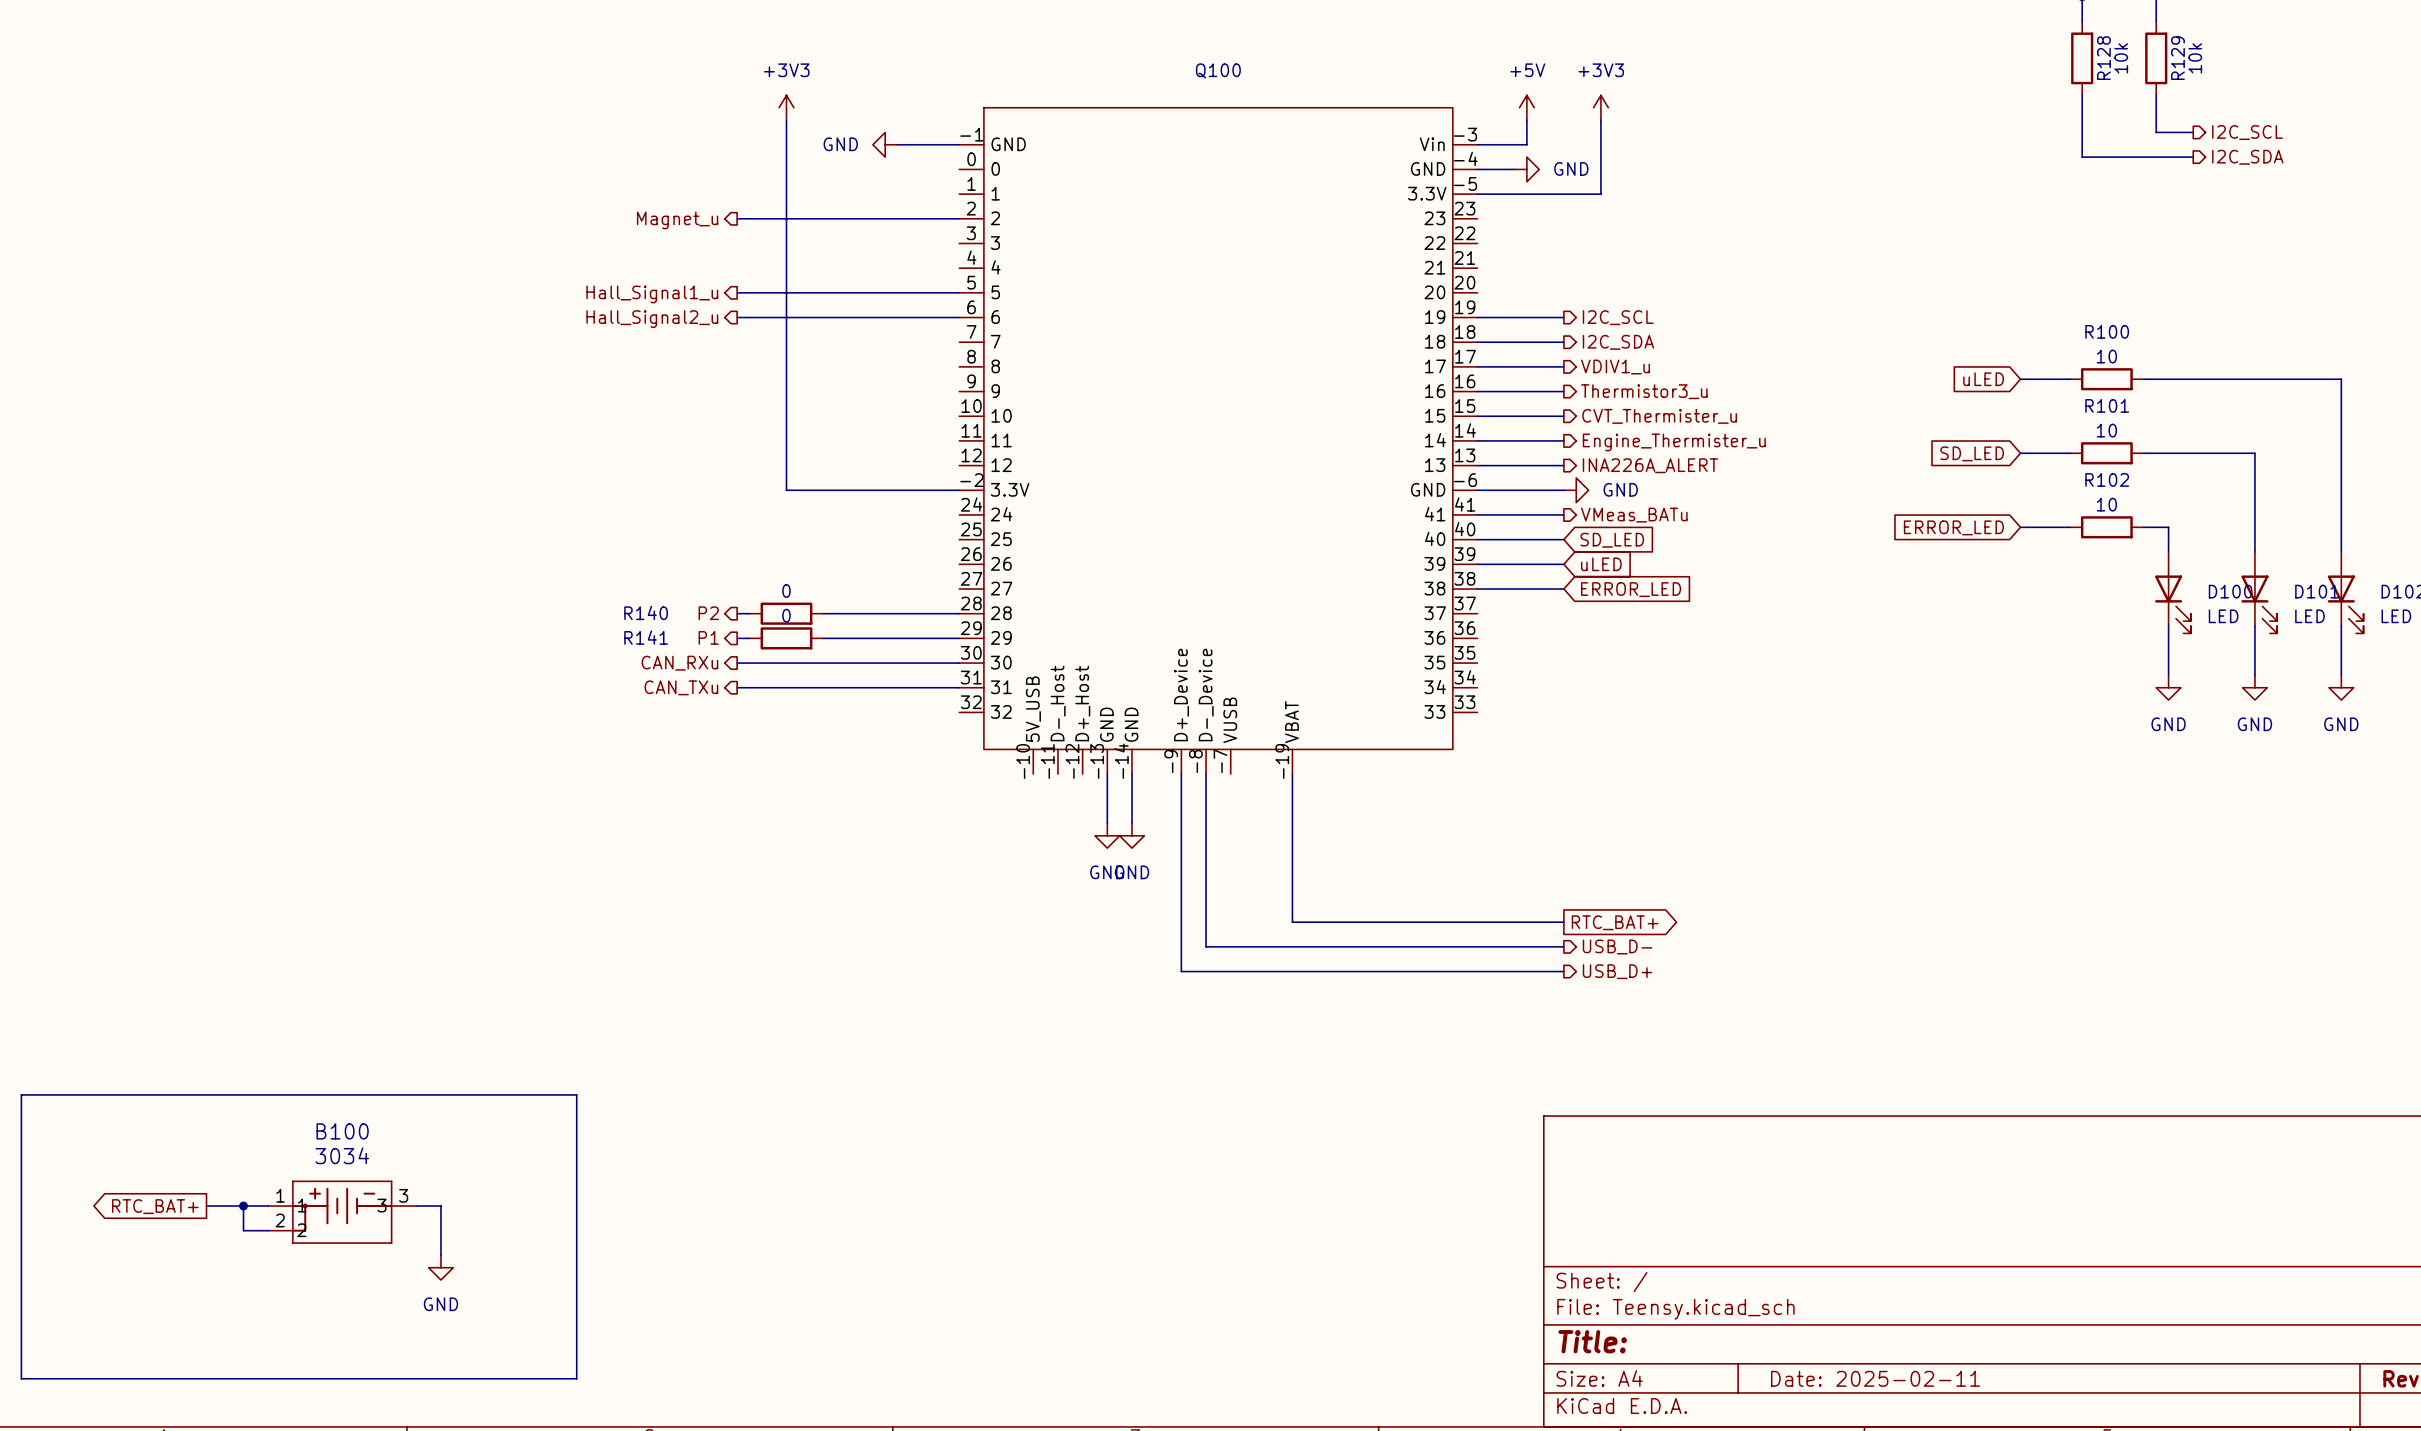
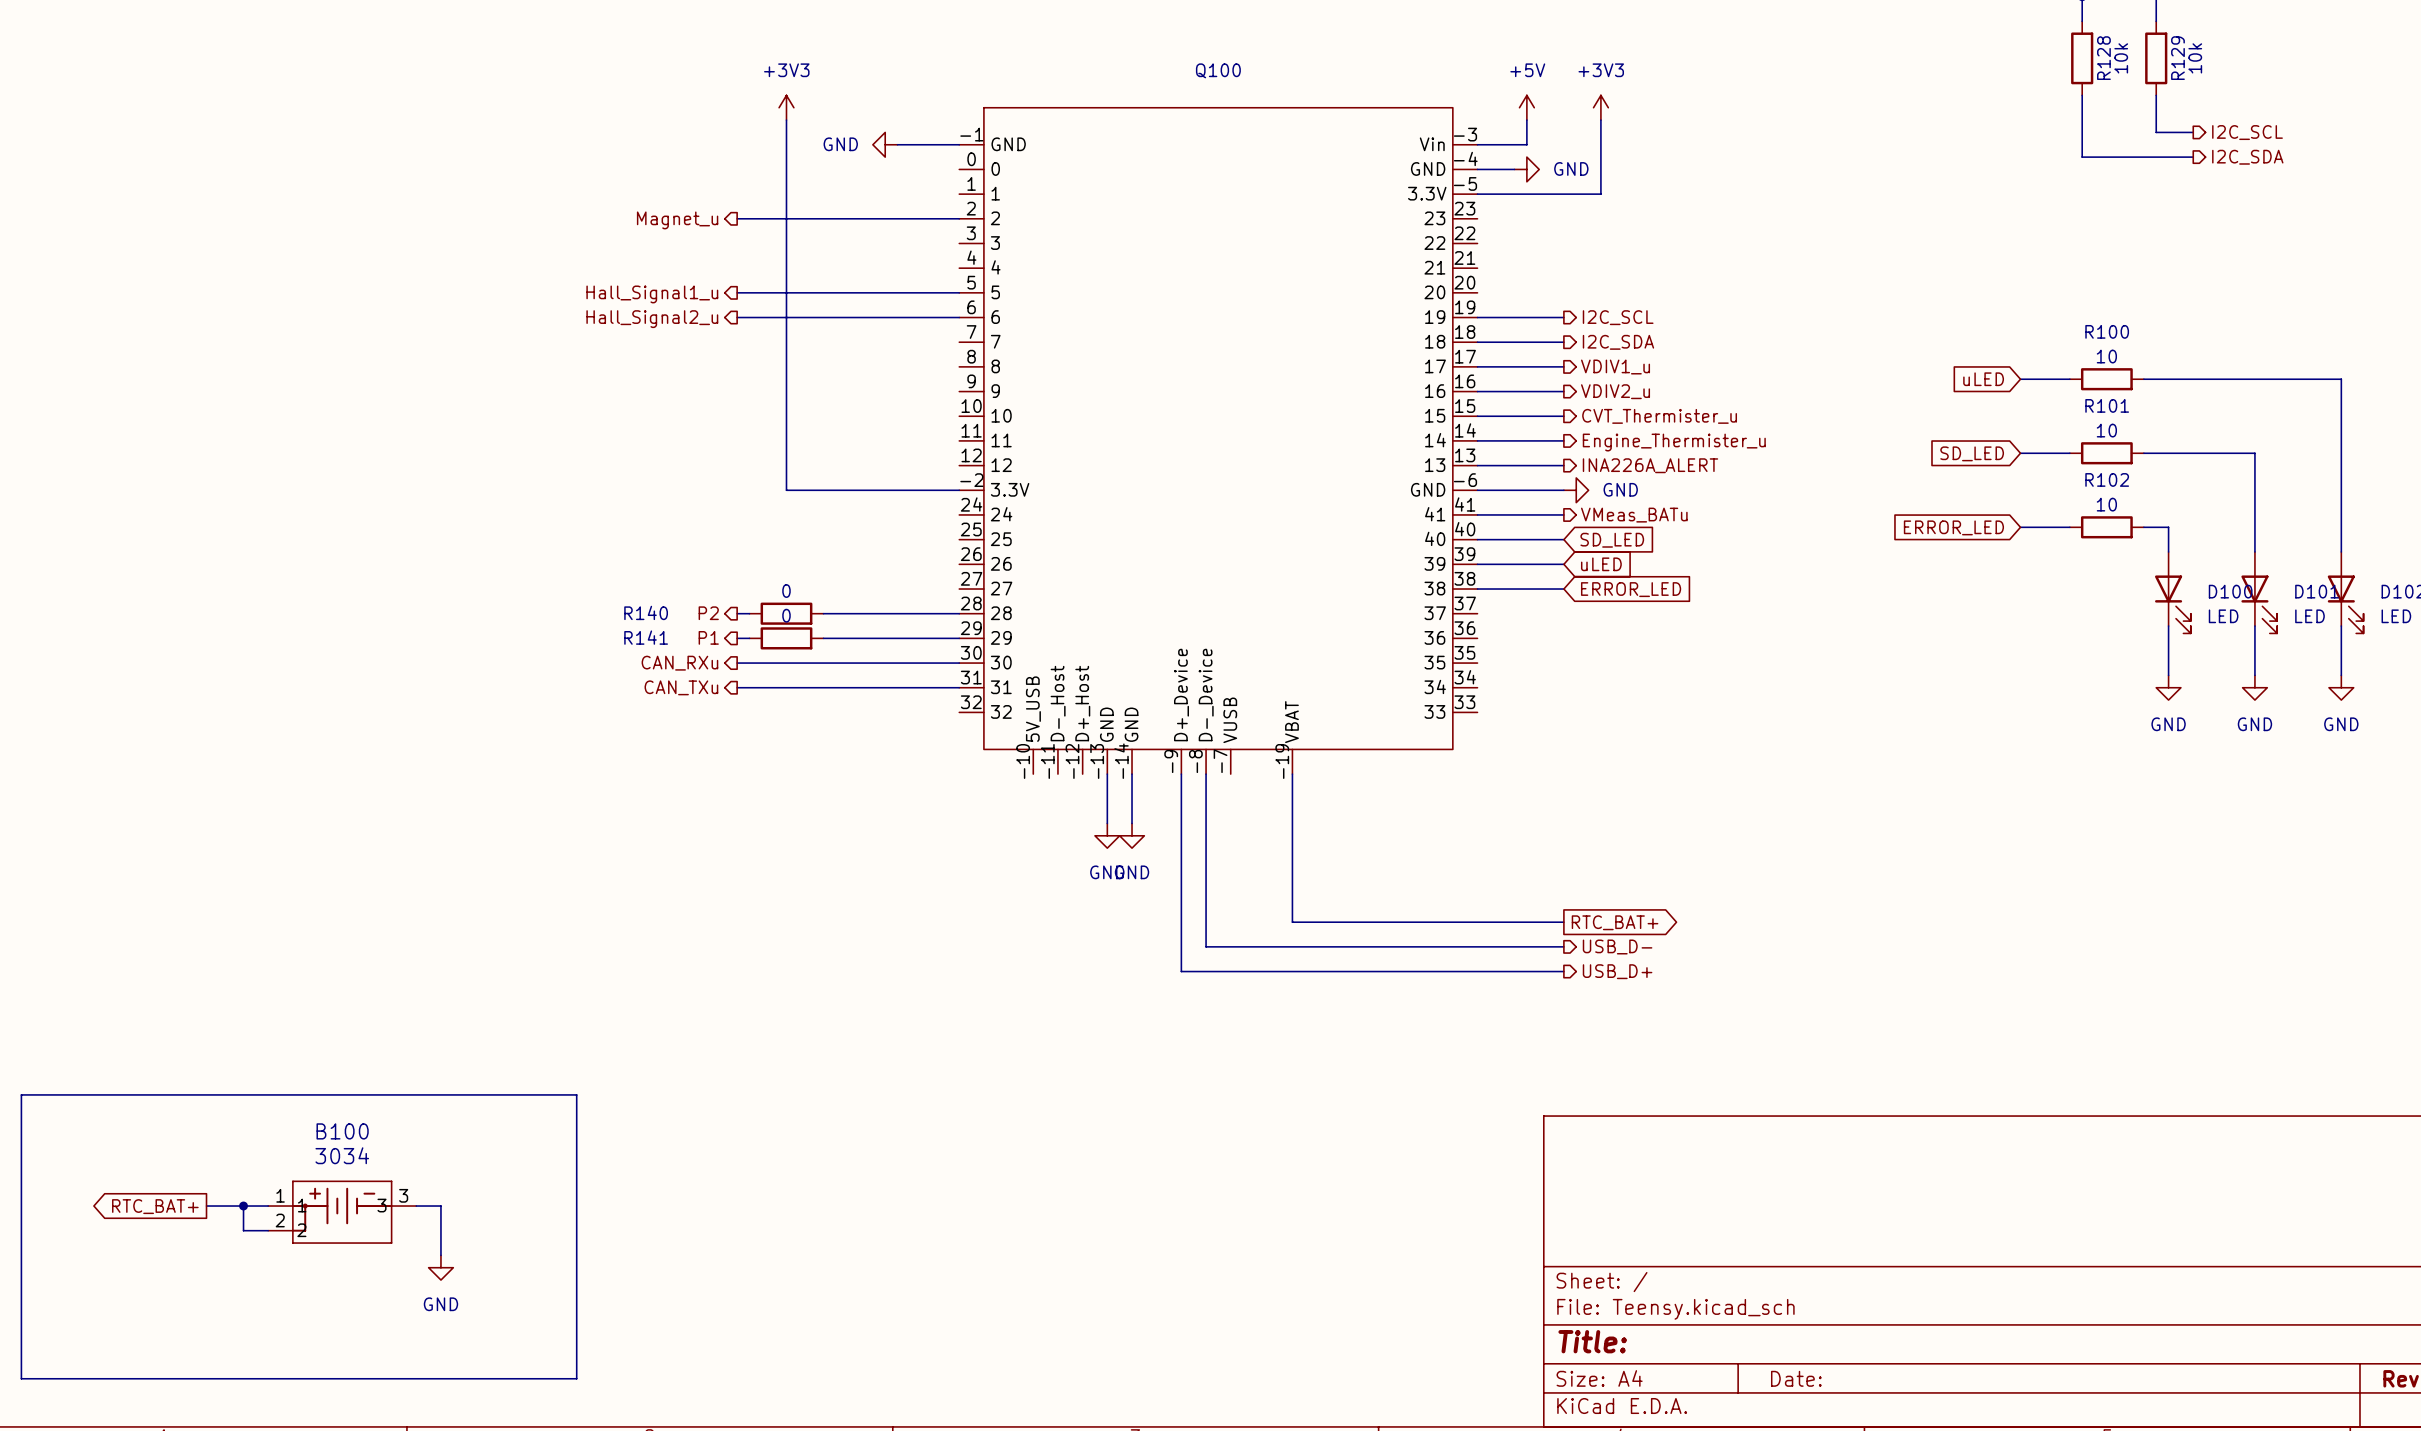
hierarchical label: Thermistor3_u (1644, 391) -> VDIV2_u (1615, 391)
title block: Date: 2025-02-11 (1875, 1378) -> Date: (1796, 1378)

